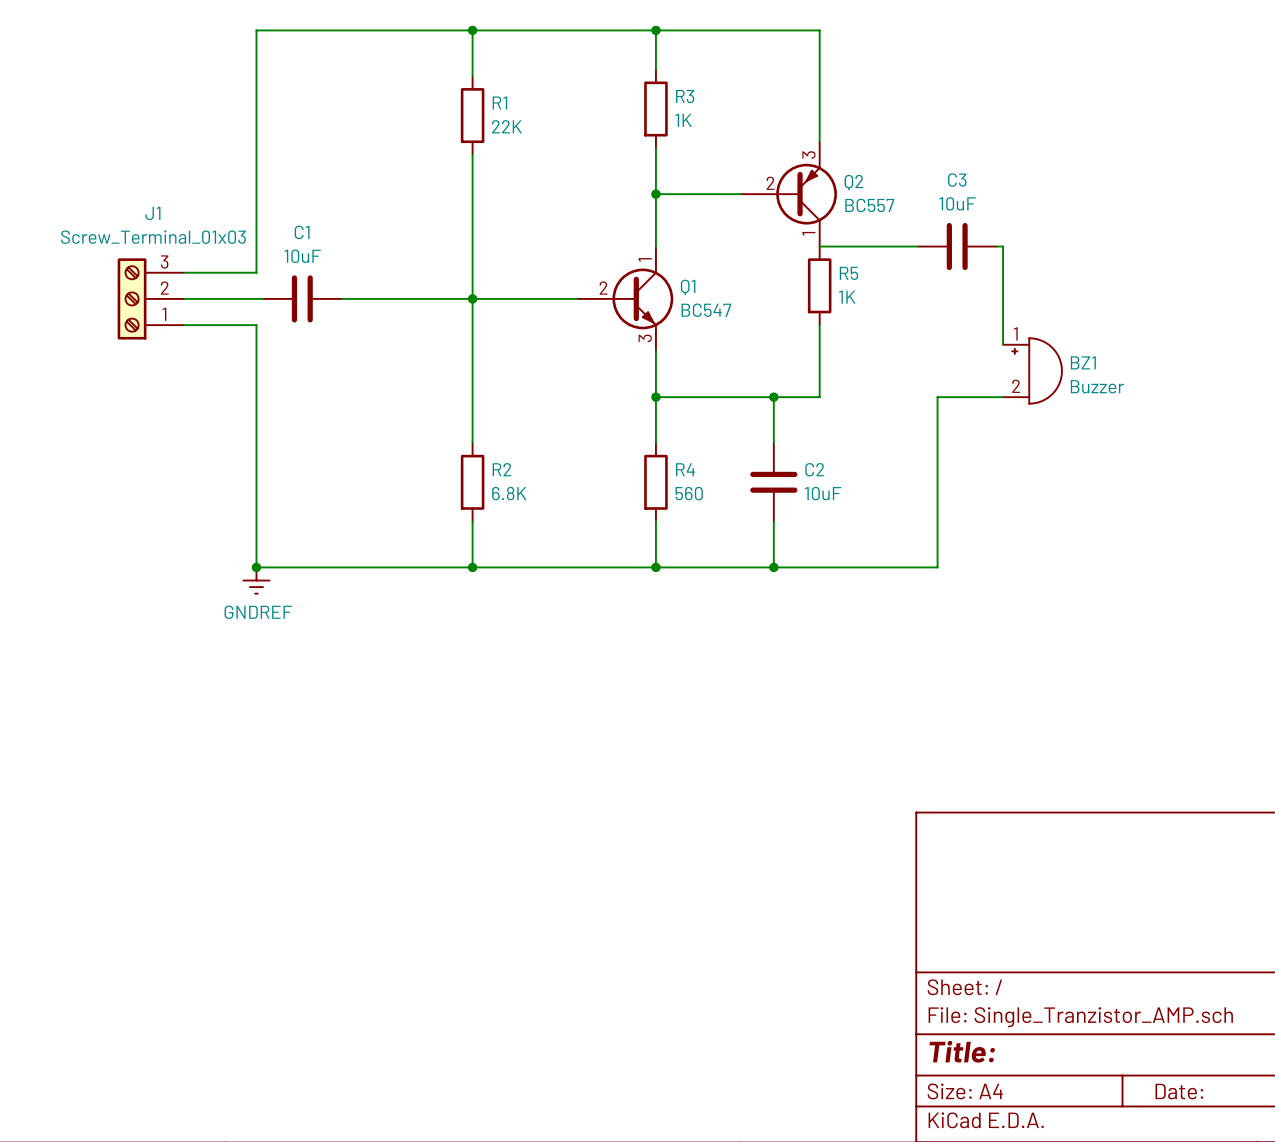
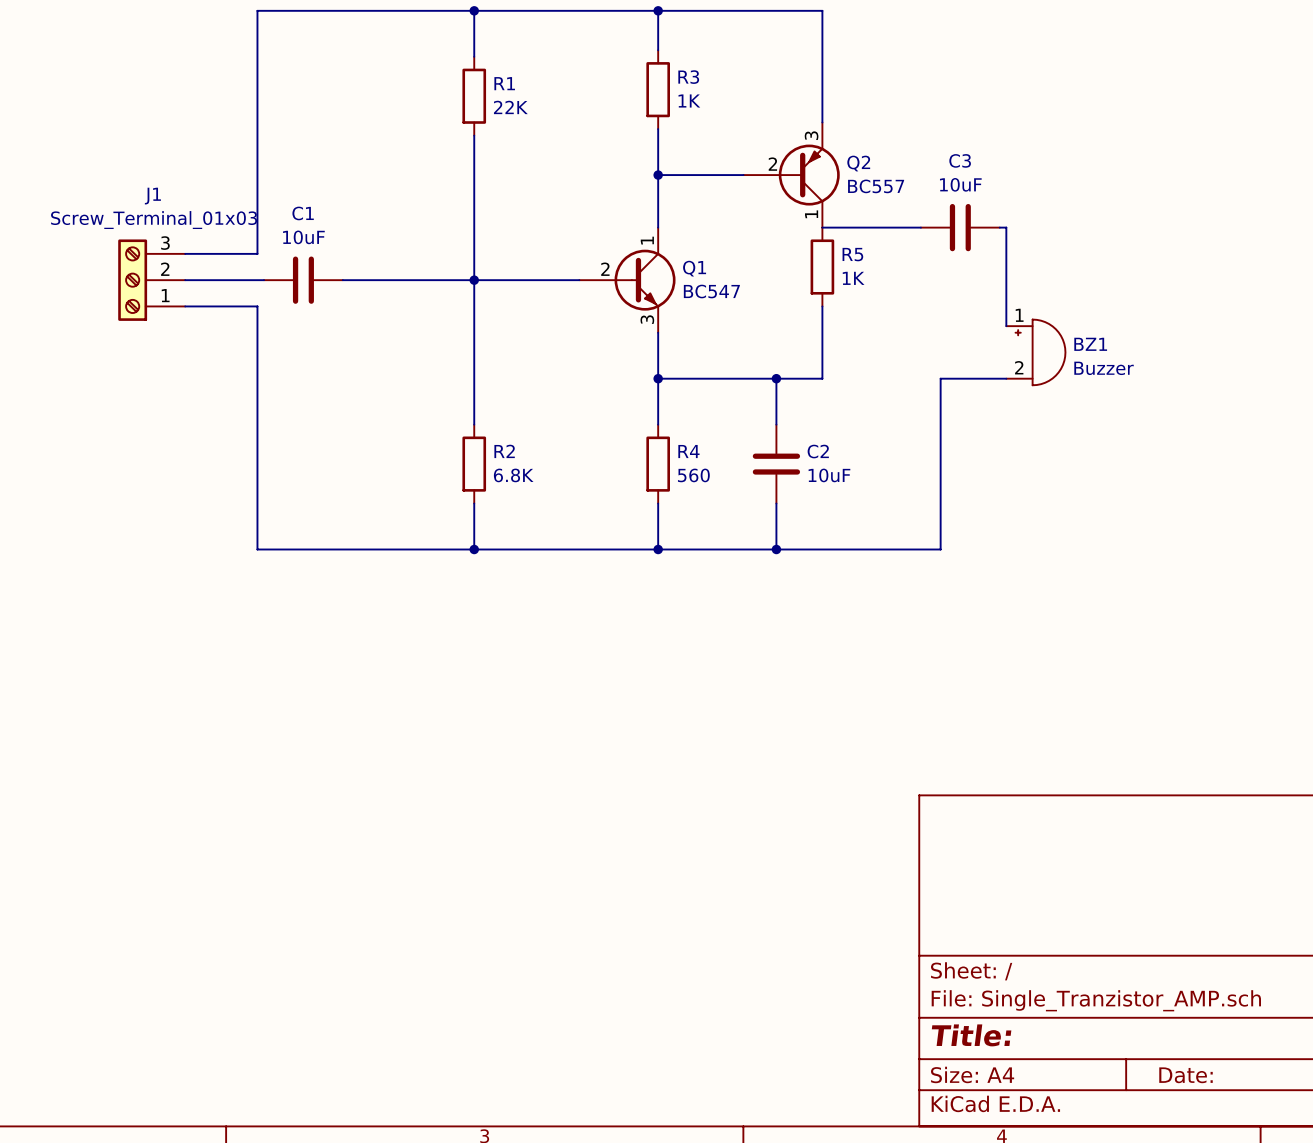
junction: (256, 567) -> none
power symbol: GNDREF (256, 580) -> none

